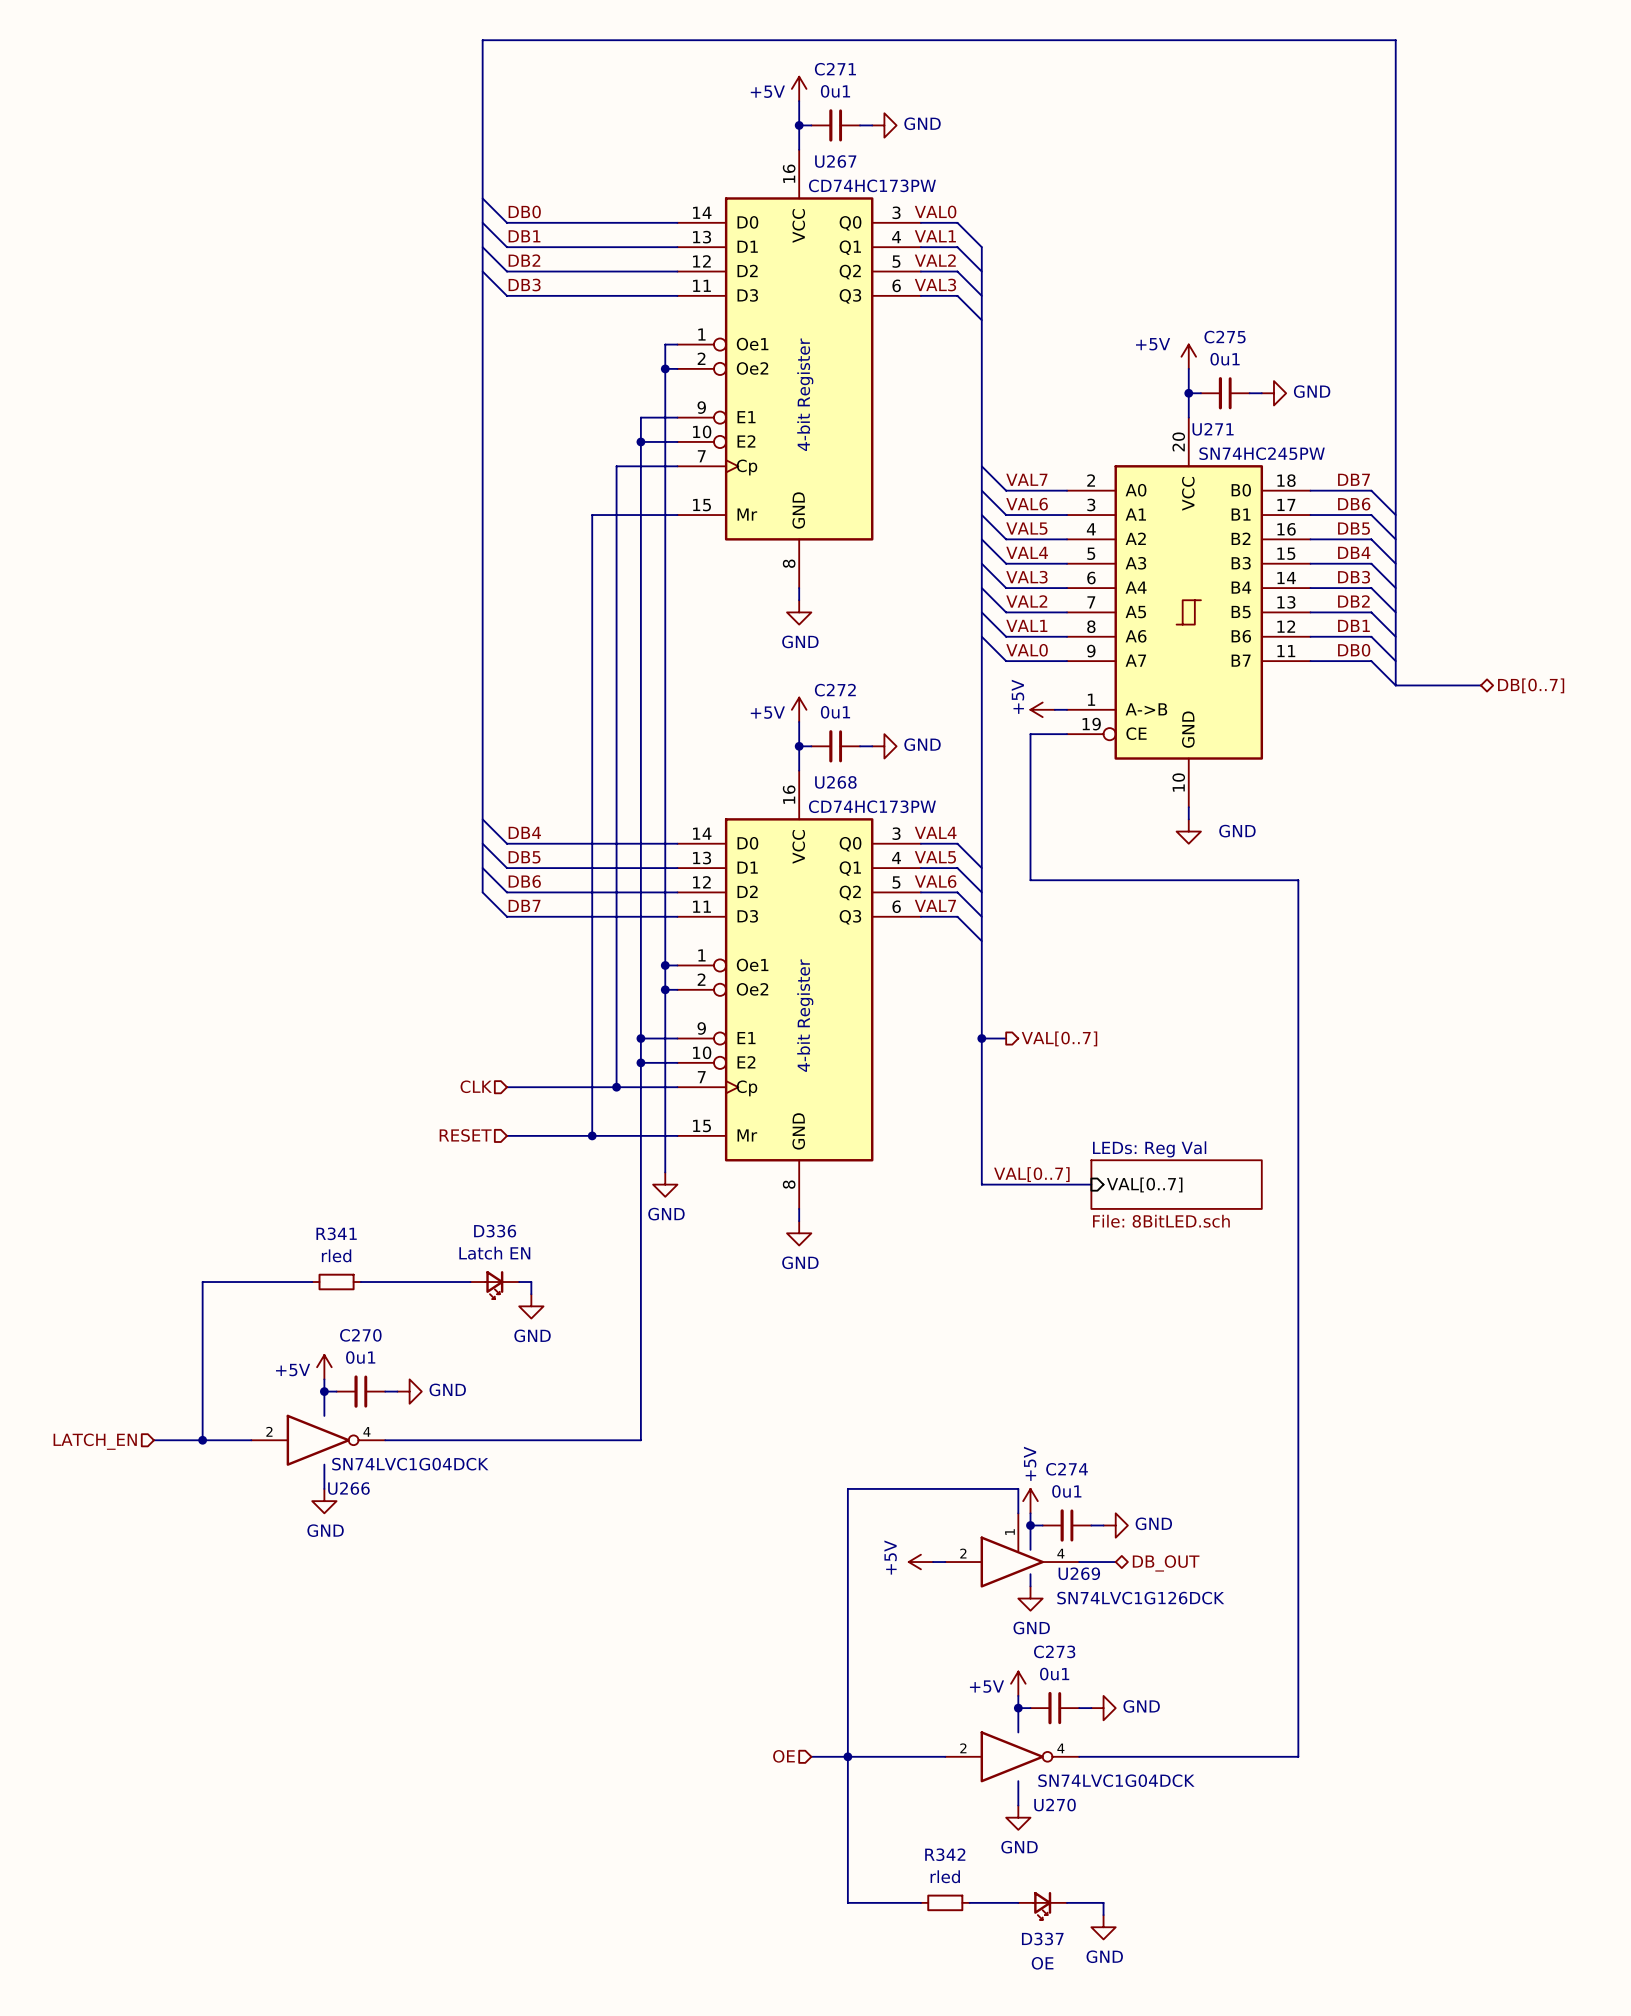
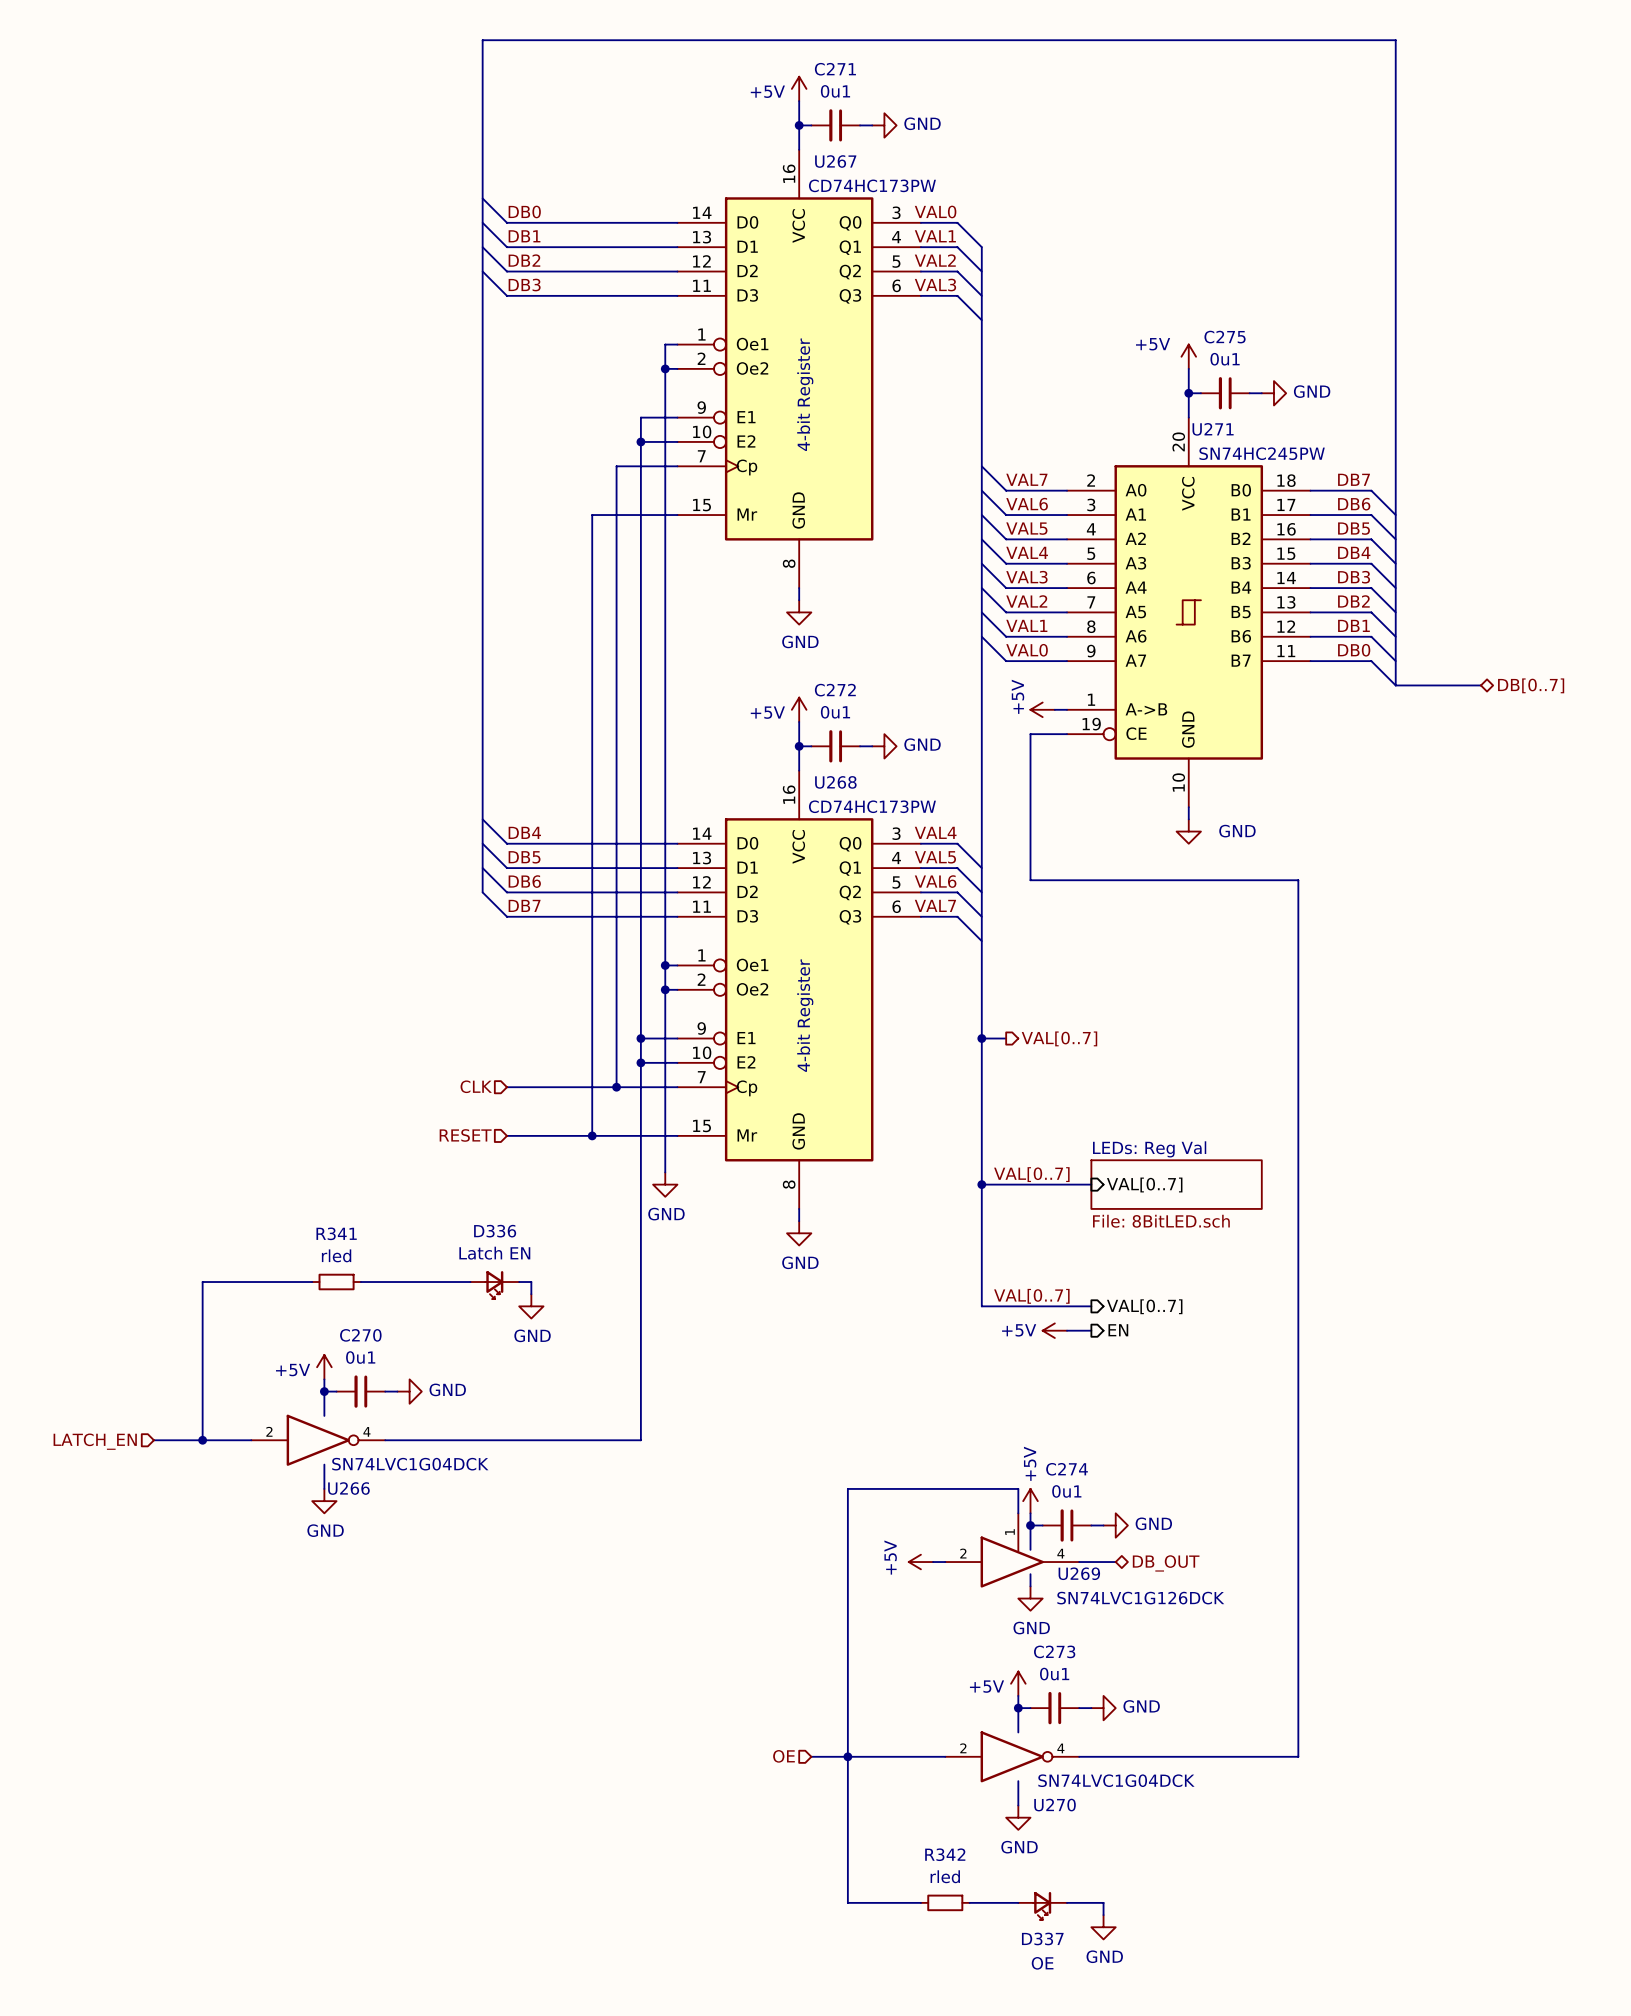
bus: none -> (981, 1184) (981, 1306) (1091, 1306)
junction: none -> (981, 1184)
label: none -> VAL[0..7] (1031, 1296)
sheet pin: none -> VAL[0..7] (1144, 1306)
power symbol: none -> +5V (1054, 1330)
wire: none -> (1067, 1330) (1091, 1330)
sheet pin: none -> EN (1118, 1330)

